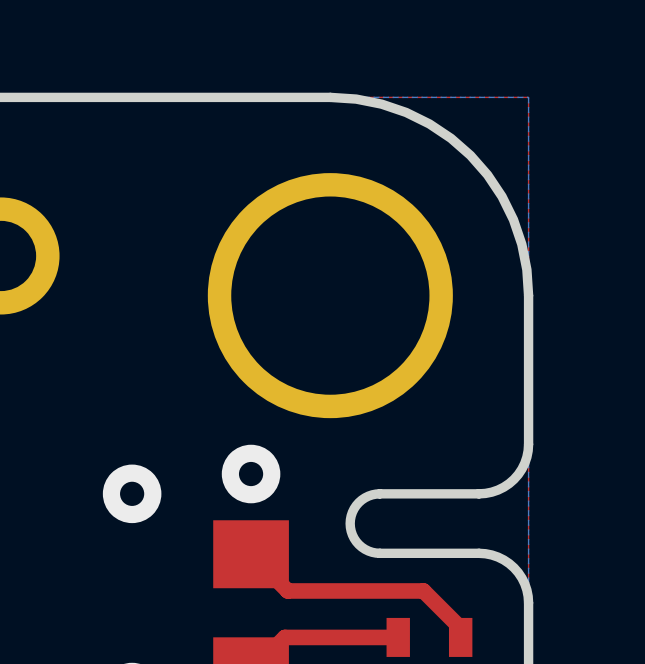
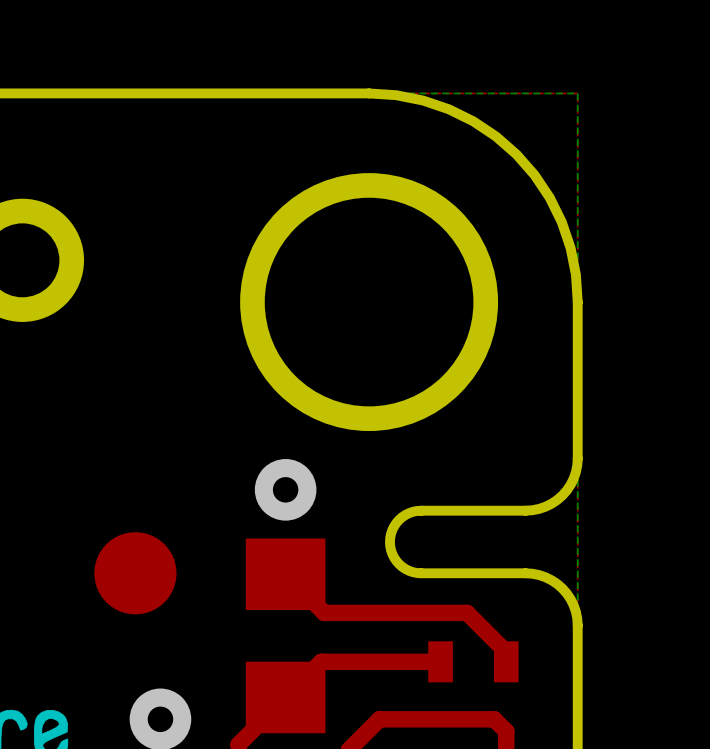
via: (132, 493) -> none
part: none -> (135, 573)

